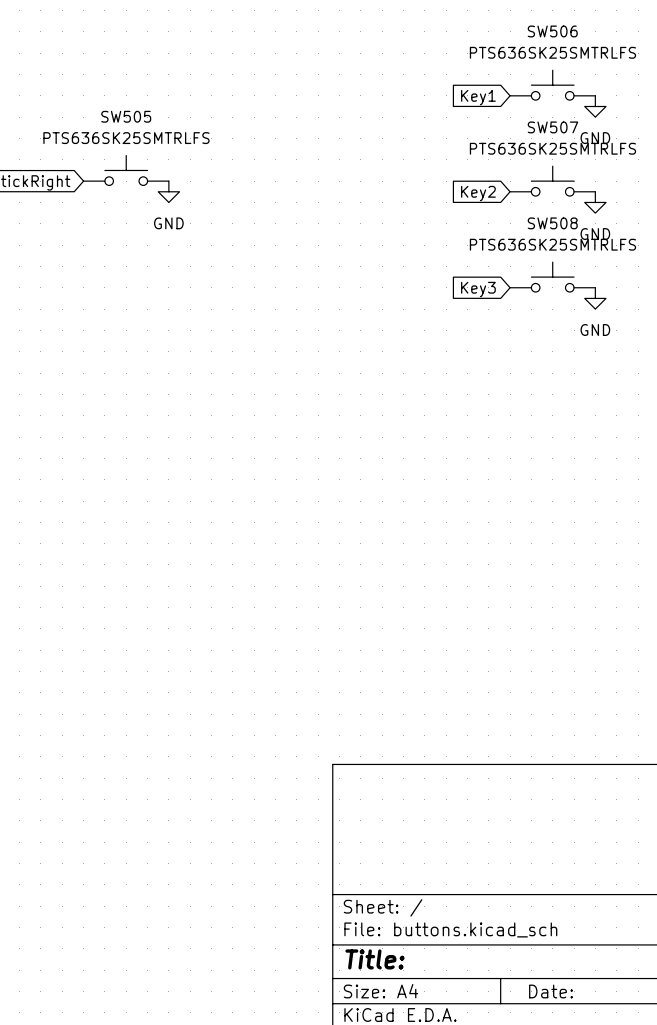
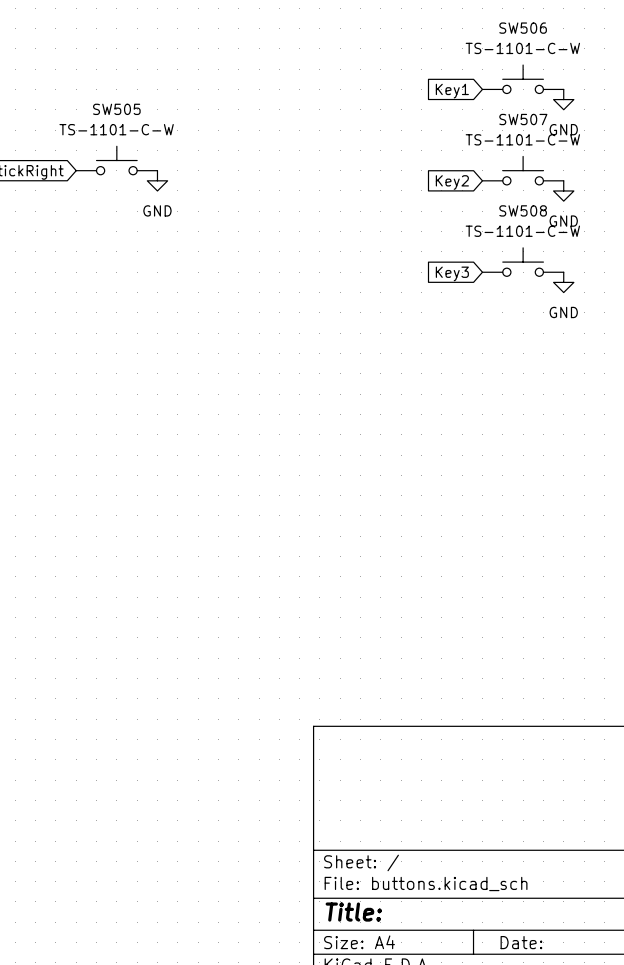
SW506 value: PTS636SK25SMTRLFS (552, 52) -> TS-1101-C-W (522, 48)
SW505 value: PTS636SK25SMTRLFS (126, 138) -> TS-1101-C-W (116, 129)
SW507 value: PTS636SK25SMTRLFS (552, 148) -> TS-1101-C-W (522, 139)
SW508 value: PTS636SK25SMTRLFS (552, 244) -> TS-1101-C-W (522, 231)

